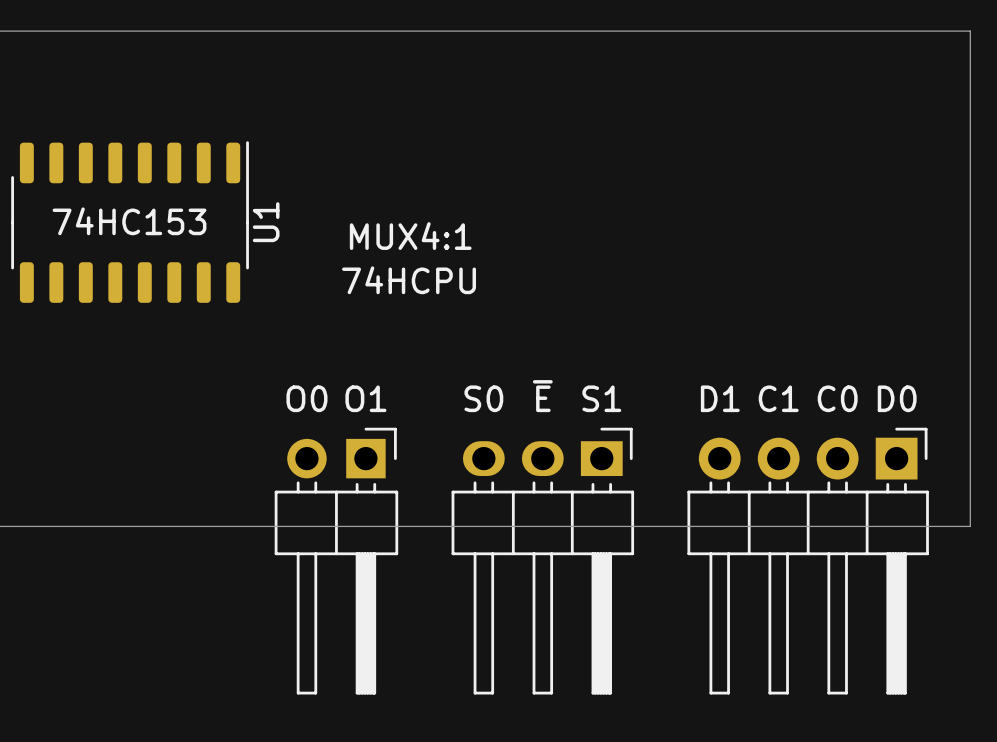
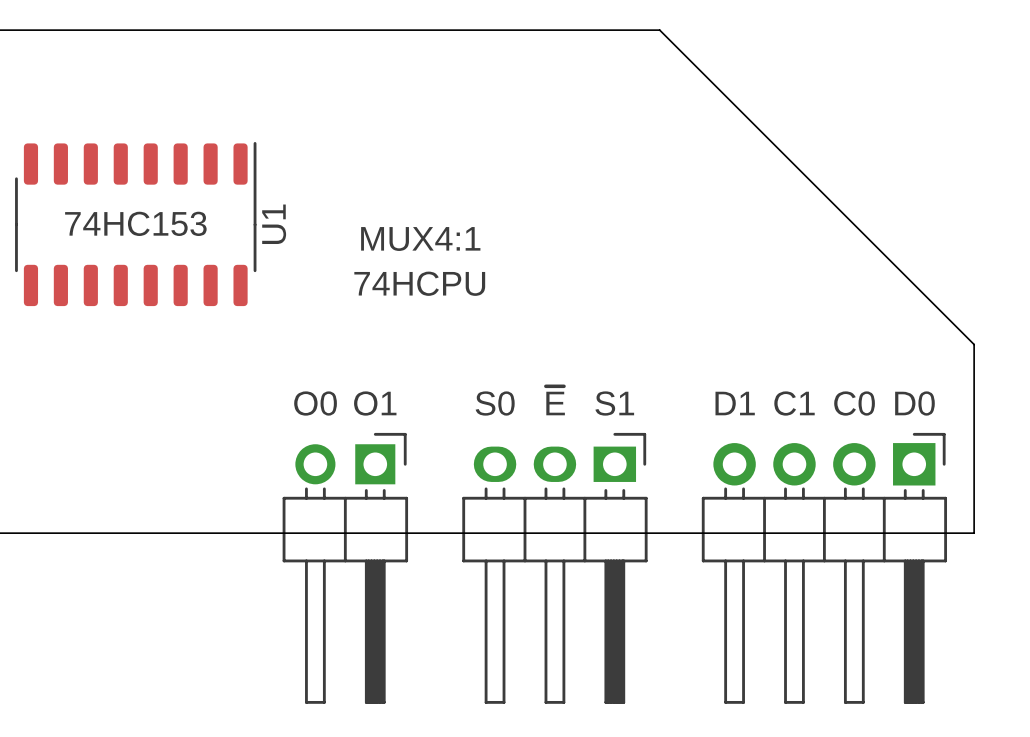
board edge: (646, 31) (970, 31) (970, 526) (955, 526) -> (659, 30) (974, 344) (974, 533)

